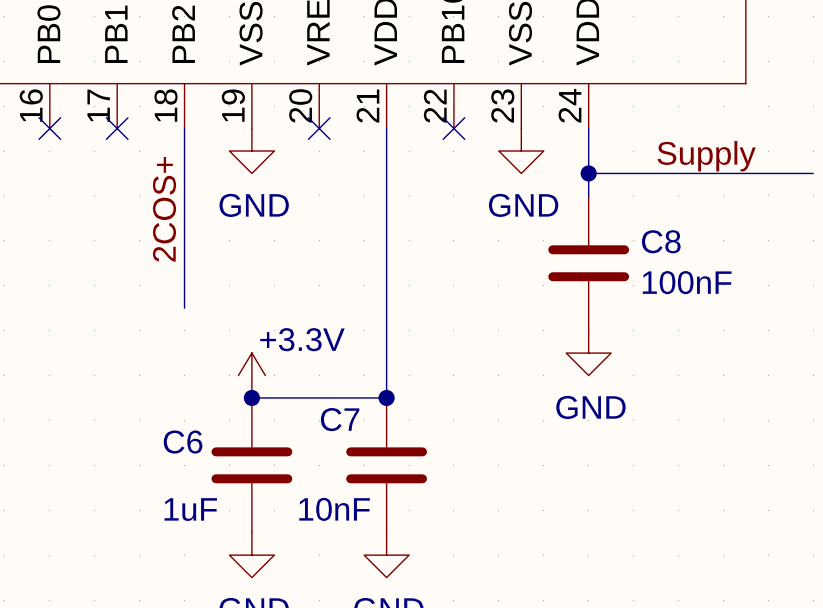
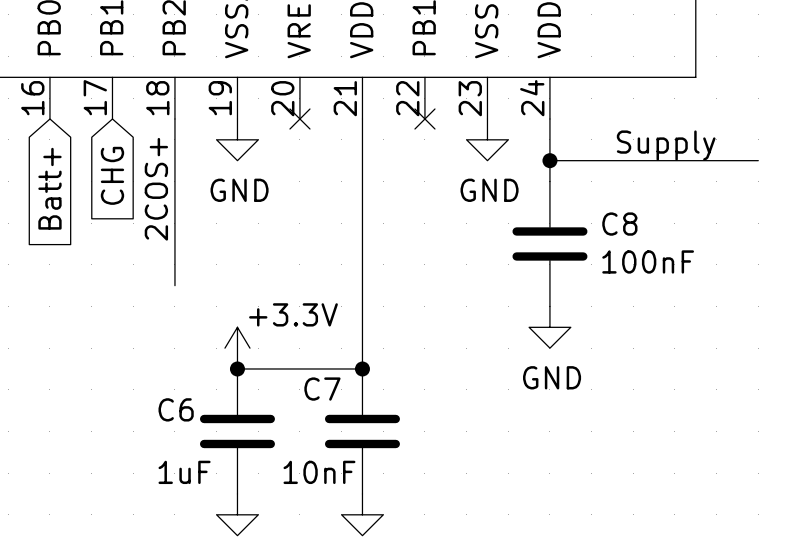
no-connect mark: (49, 128) -> none
no-connect mark: (117, 128) -> none
global label: none -> CHG (112, 175)
global label: none -> Batt+ (49, 188)

